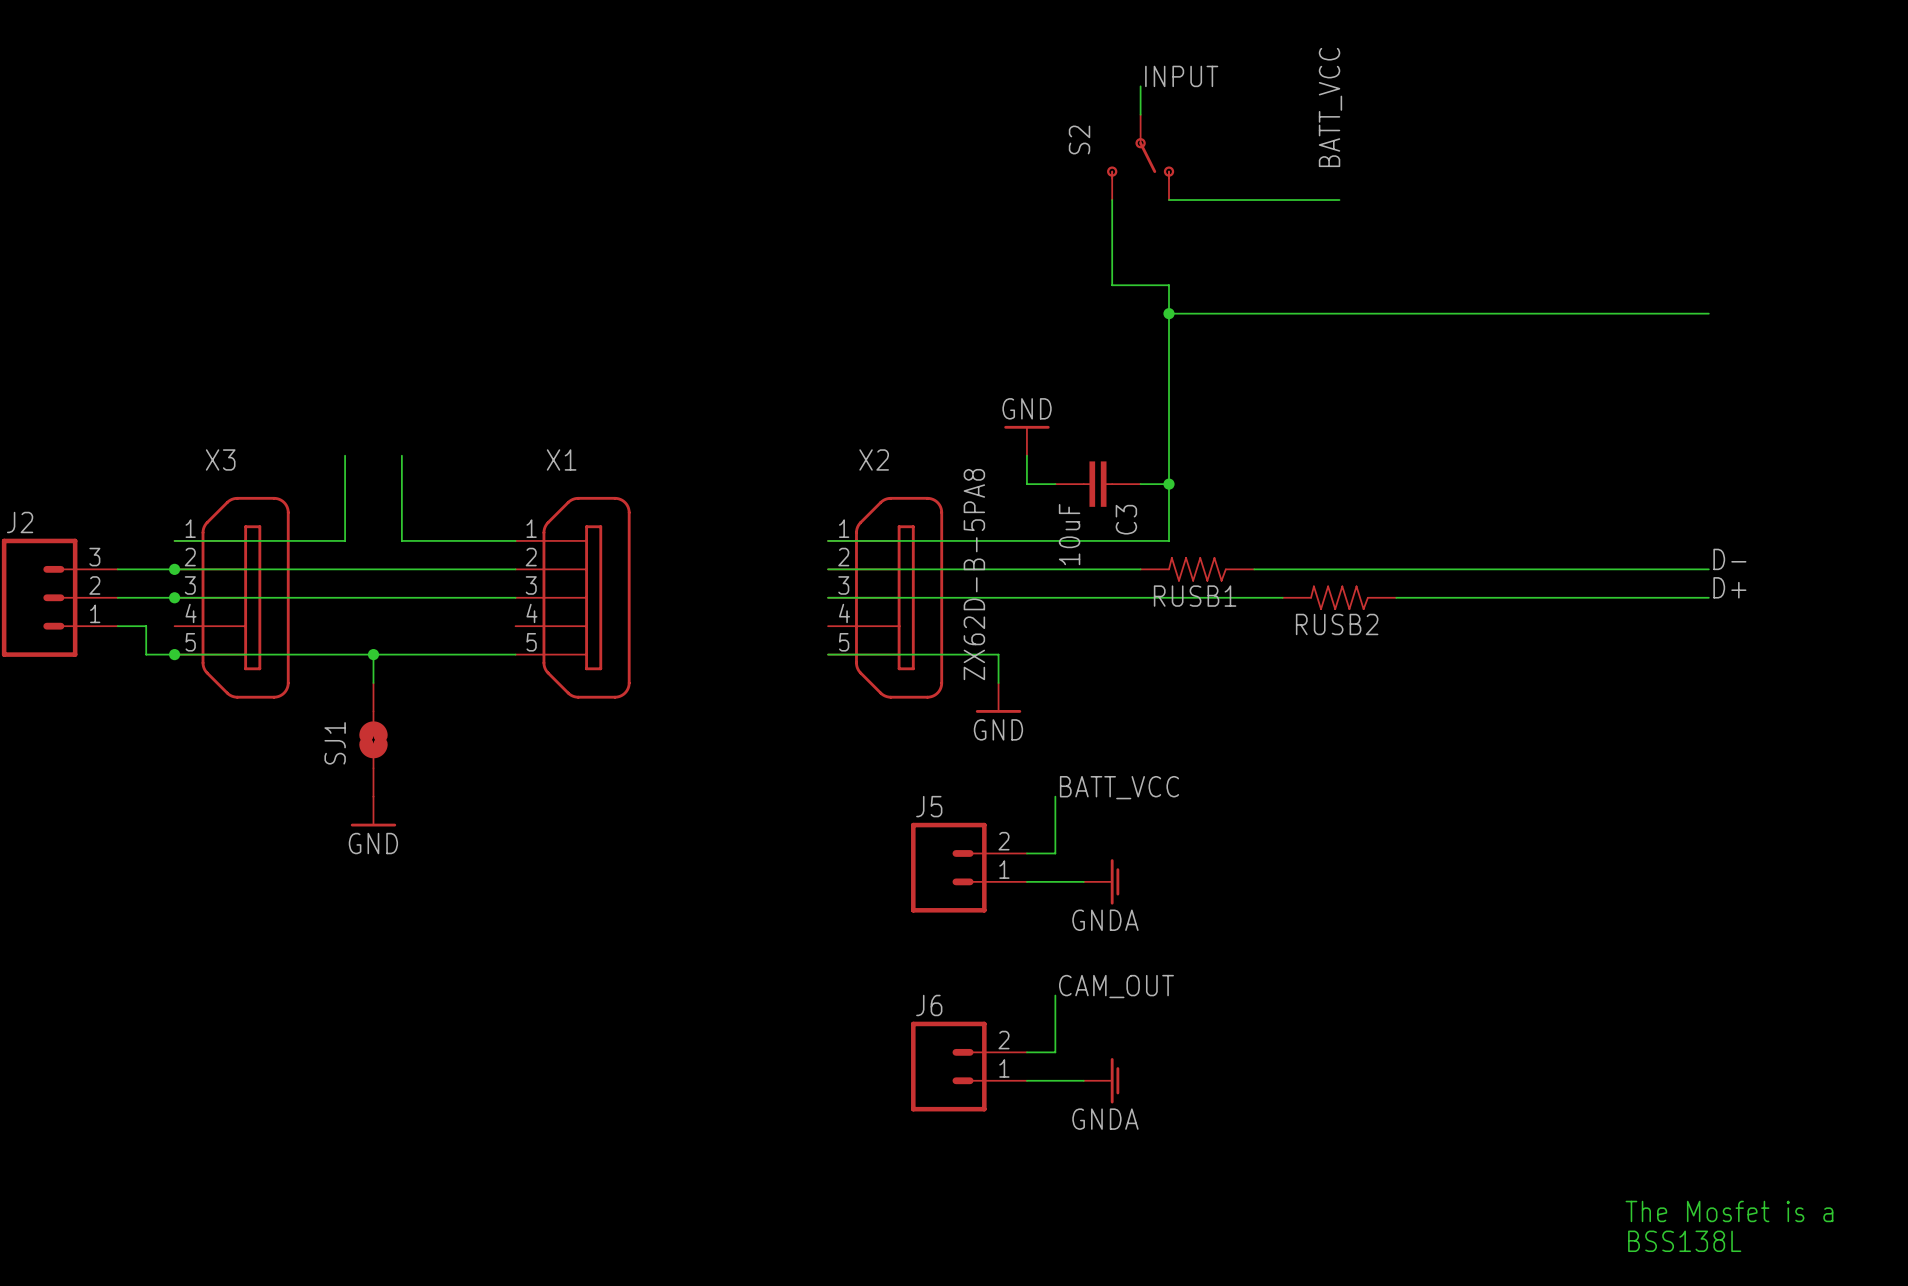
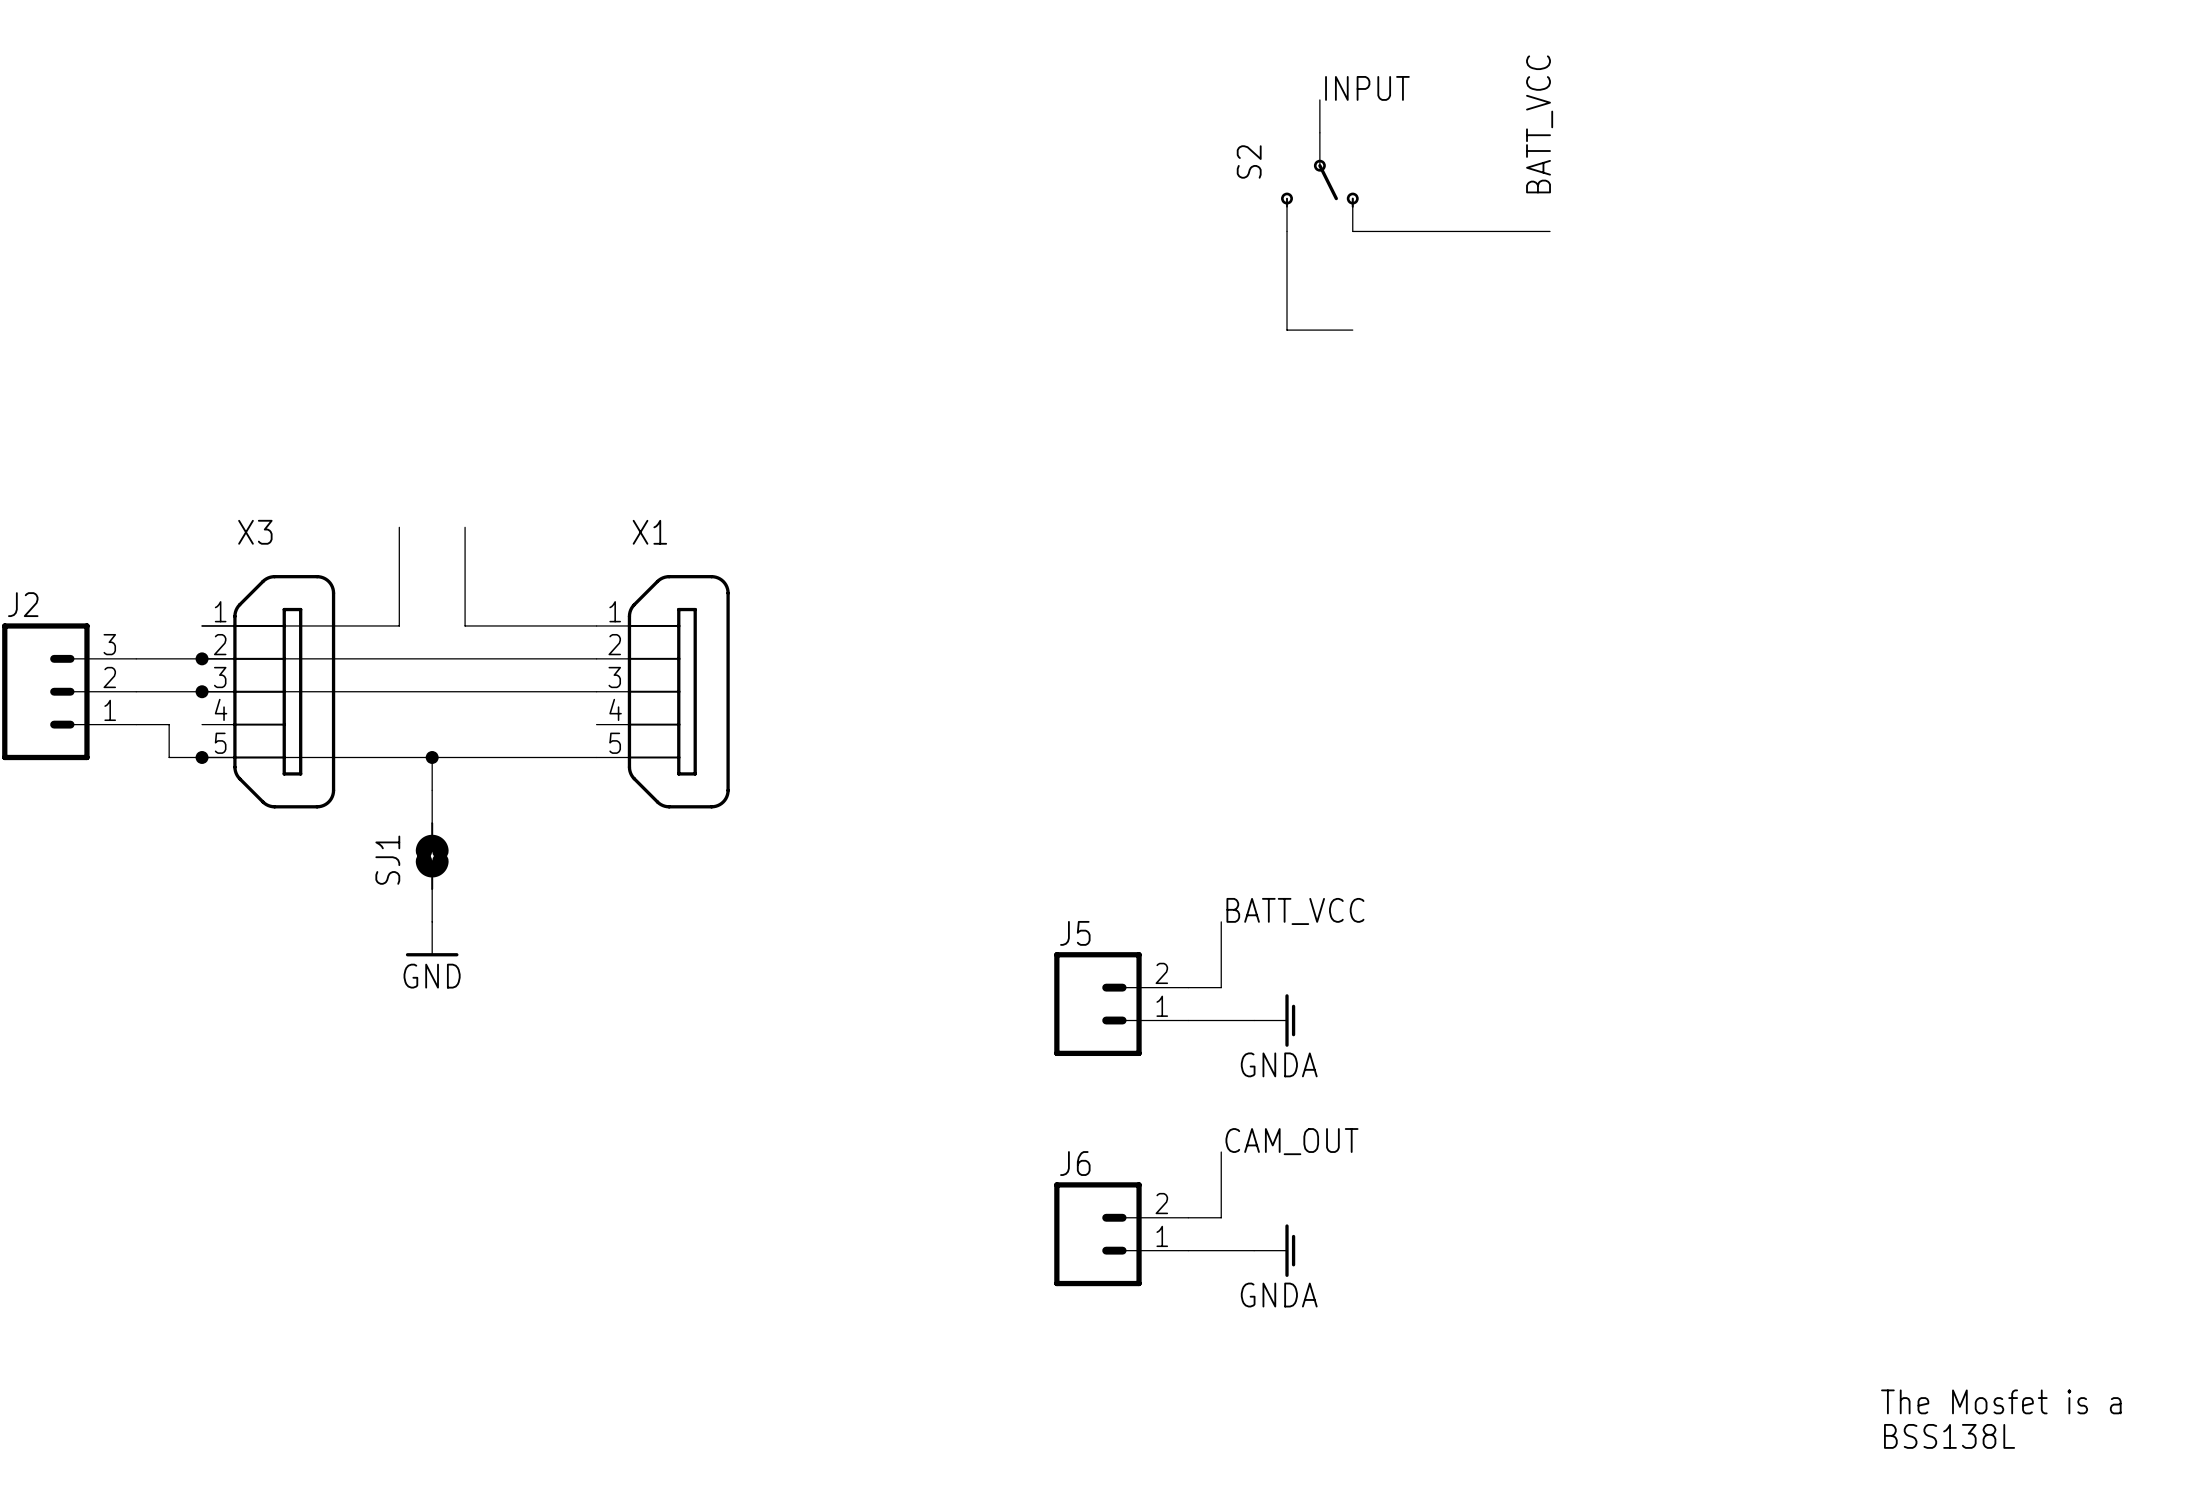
wire: (1169, 285) (1169, 540) (828, 540) -> none
wire: (1169, 313) (1708, 313) -> none
junction: (1169, 313) -> none
power symbol: GND (1026, 440) -> none
wire: (1026, 455) (1026, 484) (1055, 484) -> none
C3: 10uF (1097, 484) -> none
wire: (1140, 484) (1169, 484) -> none
junction: (1169, 484) -> none
label: D- (1729, 559) -> none
wire: (828, 569) (1140, 569) -> none
RUSB1: (1197, 569) -> none
wire: (1254, 569) (1708, 569) -> none
label: D+ (1729, 587) -> none
wire: (828, 597) (1282, 597) -> none
X2: ZX62D-B-5PA8 (885, 597) -> none
RUSB2: (1339, 597) -> none
wire: (1396, 597) (1708, 597) -> none
wire: (828, 654) (998, 654) (998, 683) -> none
power symbol: GND (998, 697) -> none

